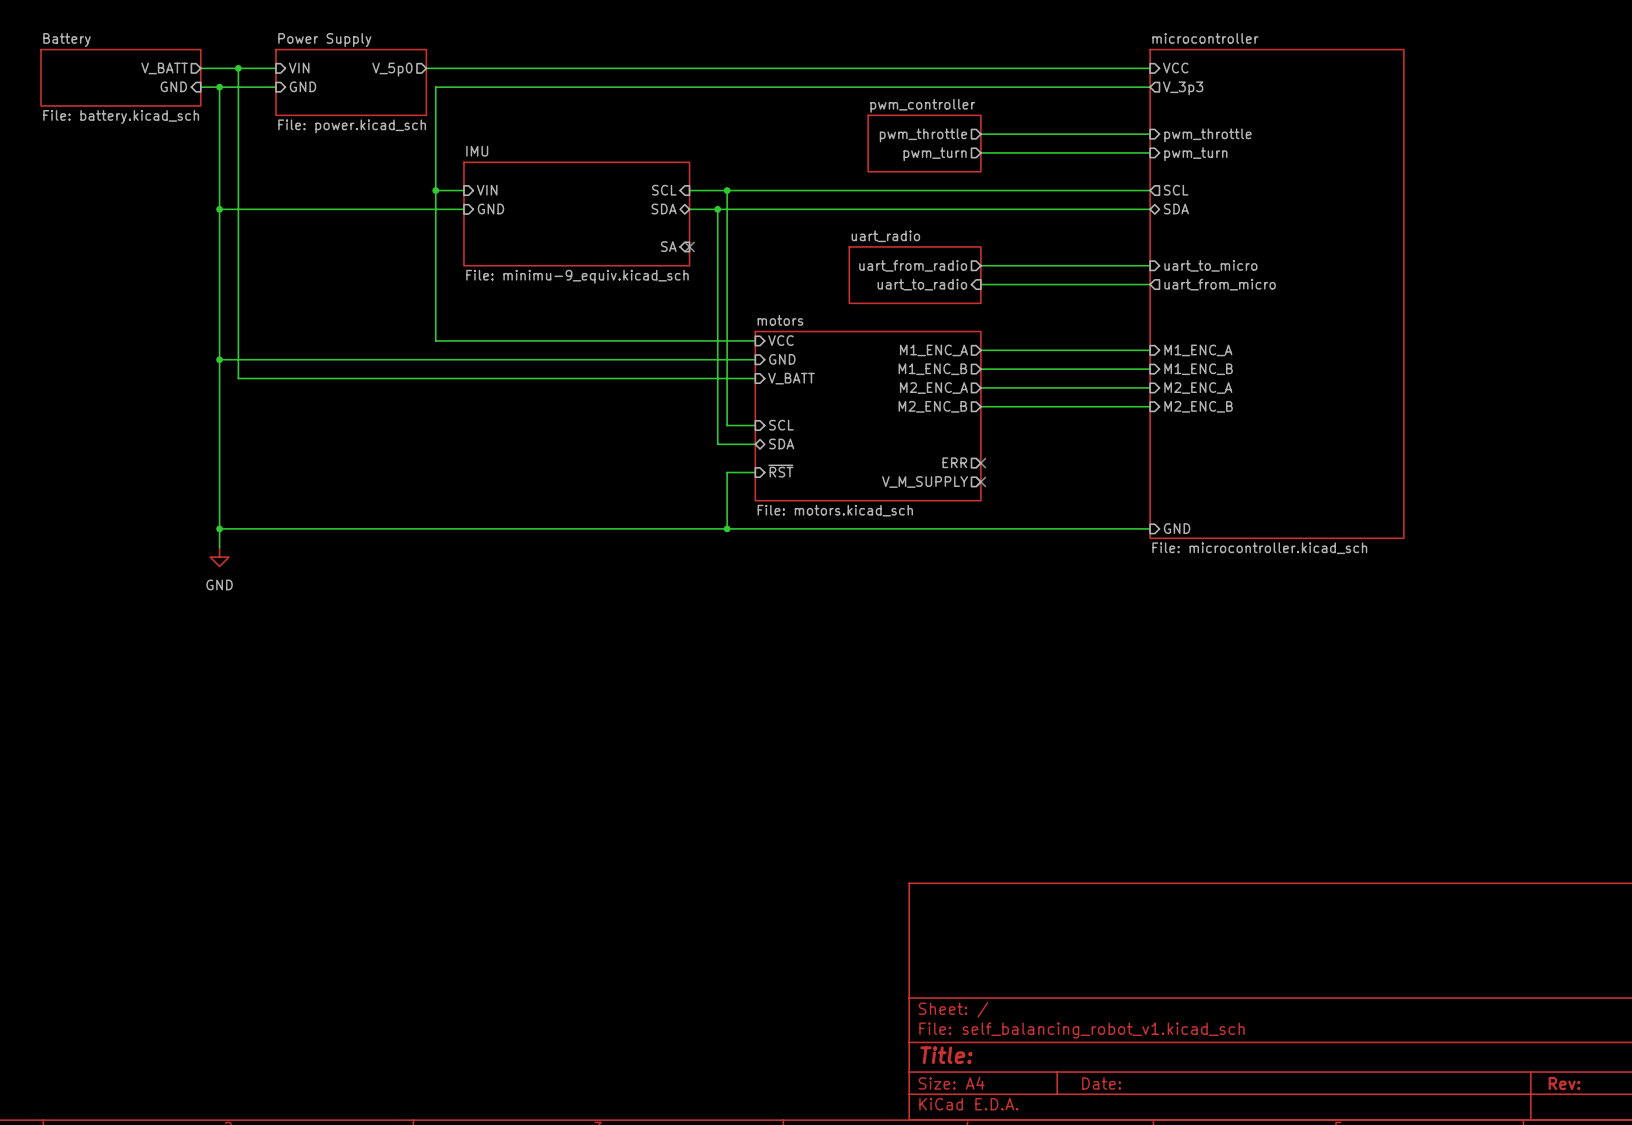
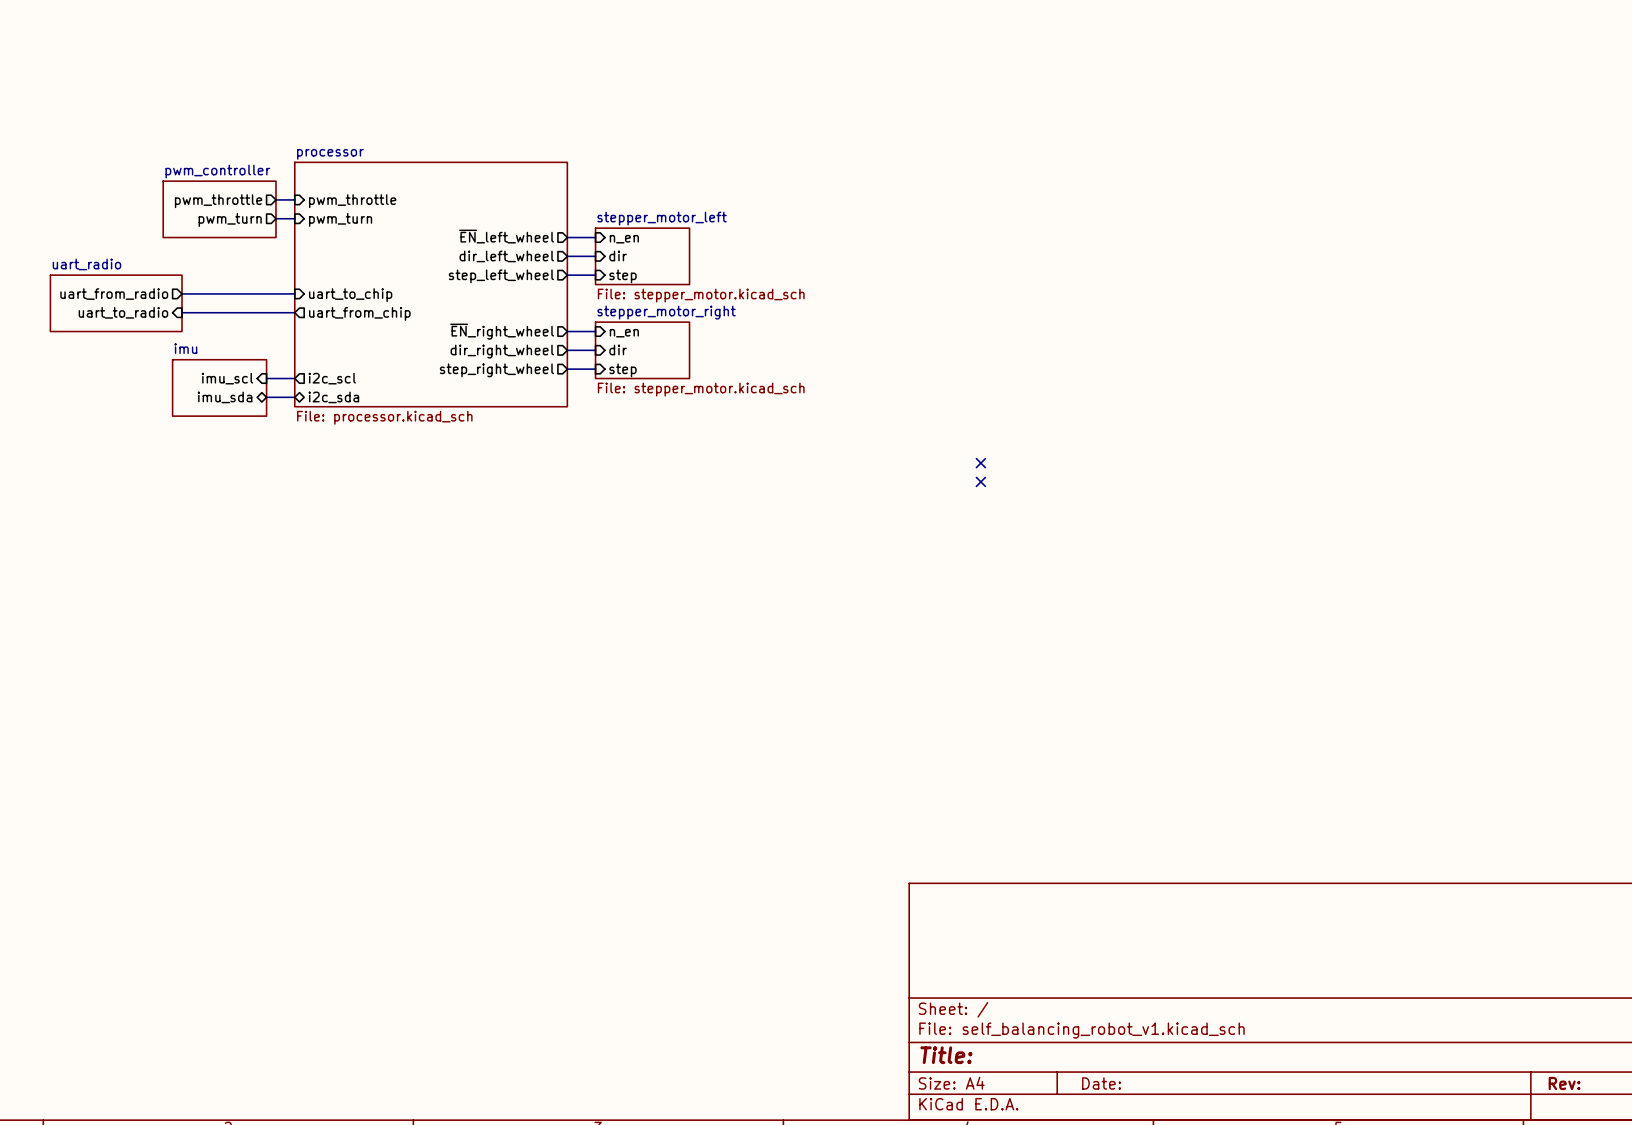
sheet pin: V_BATT (164, 68) -> none
wire: (200, 68) (275, 68) -> none
wire: (238, 68) (238, 378) (266, 378) -> none
junction: (238, 68) -> none
sheet pin: VIN (299, 68) -> none
wire: (426, 68) (1150, 68) -> none
sheet pin: VCC (1175, 68) -> none
sheet pin: V_5p0 (392, 69) -> none
sheet Battery: File: battery.kicad_sch (120, 77) -> none
sheet Power Supply: File: power.kicad_sch (351, 82) -> none
sheet pin: GND (173, 86) -> none
sheet pin: GND (302, 86) -> none
wire: (200, 87) (275, 87) -> none
wire: (219, 87) (219, 547) -> none
junction: (219, 87) -> none
wire: (1150, 87) (435, 87) (435, 340) (755, 340) -> none
sheet pin: V_3p3 (1183, 88) -> none
wire: (980, 134) (1150, 134) -> none
sheet pin: pwm_throttle (923, 135) -> none
sheet pin: pwm_throttle (1207, 135) -> none
sheet pwm_controller: (924, 143) -> none
wire: (980, 152) (1150, 152) -> none
sheet pin: pwm_turn (935, 154) -> none
sheet pin: pwm_turn (1195, 154) -> none
wire: (435, 190) (463, 190) -> (567, 237) (595, 237)
junction: (435, 190) -> none
sheet pin: VIN (487, 190) -> none
sheet pin: SCL (664, 190) -> none
wire: (689, 190) (1150, 190) -> none
wire: (727, 190) (727, 425) (755, 425) -> none
junction: (727, 190) -> none
sheet pin: SCL (1176, 190) -> none
wire: none -> (275, 199) (294, 199)
sheet pin: none -> pwm_throttle (218, 201)
sheet pin: none -> pwm_throttle (352, 201)
sheet pin: GND (490, 208) -> none
sheet pin: SDA (664, 208) -> none
sheet pin: SDA (1176, 208) -> none
wire: (219, 209) (463, 209) -> none
junction: (219, 209) -> none
sheet pwm_controller: none -> (219, 209)
wire: (689, 209) (1150, 209) -> none
wire: (717, 209) (717, 444) (755, 444) -> none
junction: (717, 209) -> none
sheet IMU: File: minimu-9_equiv.kicad_sch (576, 214) -> none
wire: none -> (275, 218) (294, 218)
sheet pin: none -> pwm_turn (230, 219)
sheet pin: none -> pwm_turn (340, 219)
sheet pin: none -> ~{EN}_left_wheel (506, 236)
sheet pin: none -> n_en (624, 239)
sheet pin: SA (668, 246) -> none
no-connect mark: (689, 246) -> none
sheet pin: none -> dir (618, 255)
sheet pin: none -> dir_left_wheel (506, 256)
wire: none -> (567, 256) (595, 256)
sheet stepper_motor_left: none -> File: stepper_motor.kicad_sch (642, 256)
sheet pin: uart_from_radio (913, 265) -> none
wire: (980, 265) (1150, 265) -> none
sheet pin: uart_to_micro (1210, 265) -> none
wire: none -> (567, 275) (595, 275)
sheet uart_radio: (915, 275) -> none
sheet pin: none -> step_left_wheel (501, 276)
sheet pin: none -> step (622, 276)
sheet processor: none -> File: processor.kicad_sch (431, 284)
sheet pin: uart_to_radio (922, 284) -> none
wire: (980, 284) (1150, 284) -> none
sheet pin: uart_from_micro (1220, 284) -> none
wire: none -> (181, 293) (294, 293)
sheet microcontroller: File: microcontroller.kicad_sch (1276, 293) -> none
sheet pin: none -> uart_from_radio (114, 294)
sheet pin: none -> uart_to_chip (350, 295)
sheet uart_radio: none -> (116, 303)
sheet pin: none -> uart_to_radio (123, 312)
wire: none -> (181, 312) (294, 312)
sheet pin: none -> uart_from_chip (359, 313)
sheet pin: none -> ~{EN}_right_wheel (502, 331)
wire: none -> (567, 331) (595, 331)
sheet pin: none -> n_en (624, 333)
sheet pin: VCC (780, 340) -> none
sheet pin: none -> dir (618, 349)
wire: none -> (567, 350) (595, 350)
sheet stepper_motor_right: none -> File: stepper_motor.kicad_sch (642, 350)
sheet pin: M1_ENC_A (933, 350) -> none
wire: (980, 350) (1150, 350) -> none
sheet pin: M1_ENC_A (1198, 350) -> none
sheet pin: none -> dir_right_wheel (502, 351)
wire: (219, 359) (755, 359) -> none
junction: (219, 359) -> none
sheet pin: GND (782, 359) -> none
wire: none -> (567, 369) (595, 369)
sheet pin: M1_ENC_B (932, 369) -> none
wire: (980, 369) (1150, 369) -> none
sheet pin: M1_ENC_B (1198, 369) -> none
sheet pin: none -> step_right_wheel (496, 370)
sheet pin: none -> step (622, 370)
sheet pin: none -> imu_scl (227, 378)
wire: (294, 378) (755, 378) -> none
sheet pin: none -> i2c_scl (332, 378)
sheet pin: V_BATT (791, 378) -> none
sheet imu: none -> (219, 387)
wire: (980, 387) (1150, 387) -> none
sheet pin: M2_ENC_A (933, 388) -> none
sheet pin: M2_ENC_A (1198, 388) -> none
sheet pin: none -> imu_sda (225, 397)
wire: none -> (266, 397) (294, 397)
sheet pin: none -> i2c_sda (333, 397)
sheet pin: M2_ENC_B (932, 406) -> none
wire: (980, 406) (1150, 406) -> none
sheet pin: M2_ENC_B (1198, 406) -> none
sheet motors: File: motors.kicad_sch (868, 416) -> none
sheet pin: SCL (781, 425) -> none
sheet pin: SDA (781, 443) -> none
sheet pin: ERR (954, 462) -> none
sheet pin: ~{RST} (780, 471) -> none
wire: (755, 472) (727, 472) (727, 528) -> none
sheet pin: V_M_SUPPLY (925, 482) -> none
wire: (219, 528) (1150, 528) -> none
junction: (219, 528) -> none
junction: (727, 528) -> none
sheet pin: GND (1177, 528) -> none
power symbol: GND (219, 557) -> none

